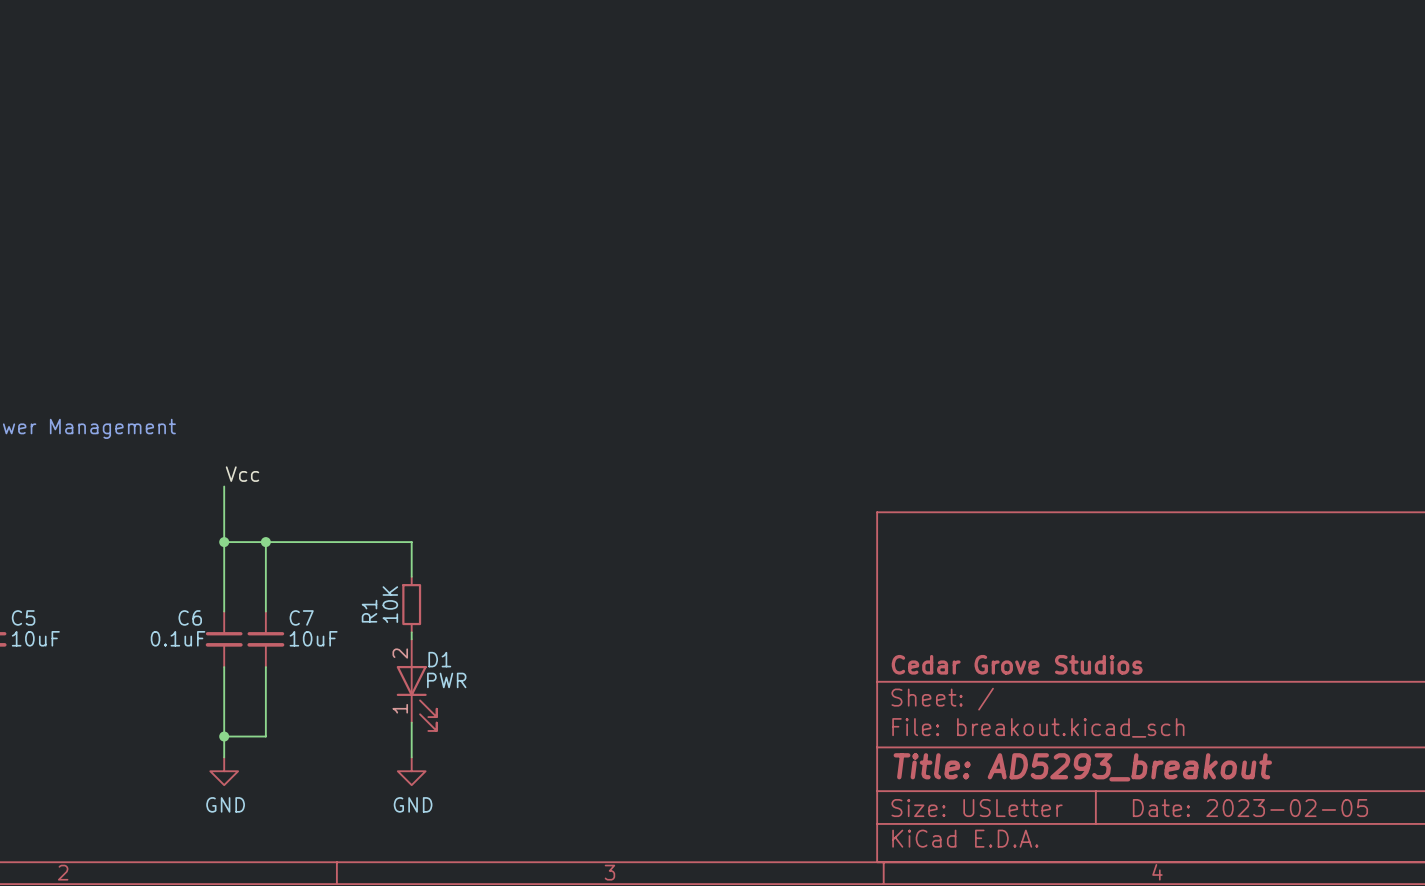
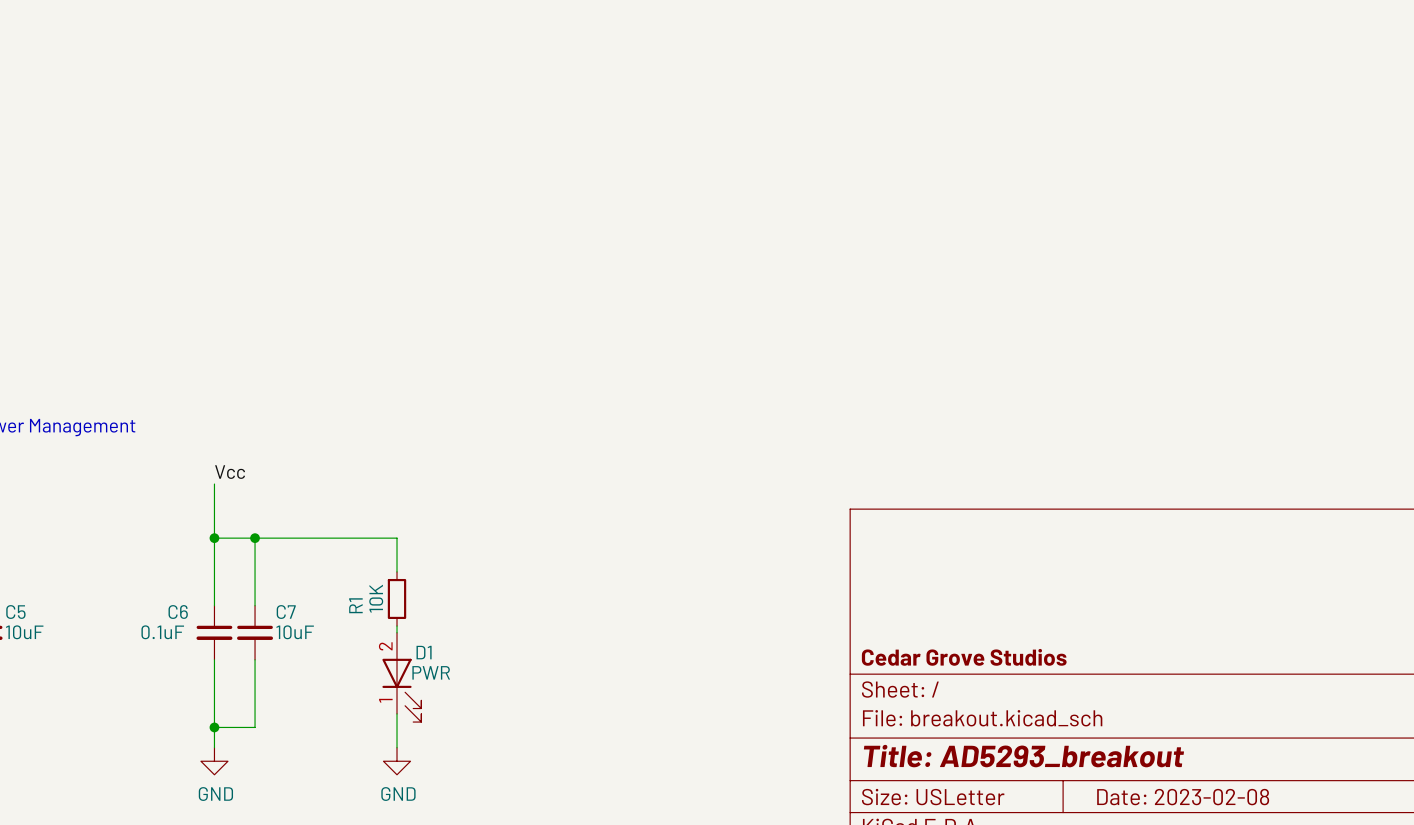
title block: Date: 2023-02-05 (1250, 808) -> Date: 2023-02-08 (1183, 797)

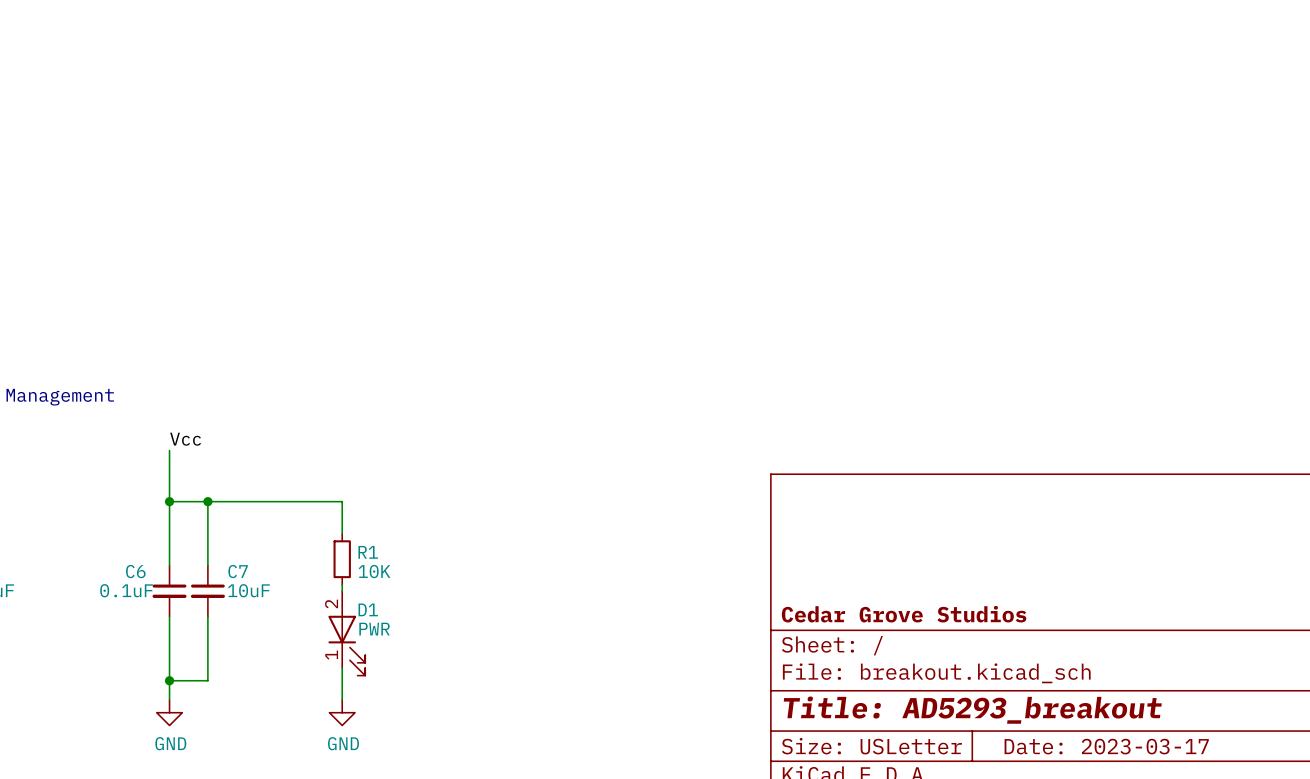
R1 value rotation: 0° (376, 598) -> 90° clockwise (374, 571)
R1 value position: 10K (376, 598) -> 10K (374, 571)
R1 name rotation: 0° (355, 605) -> 90° clockwise (368, 552)
R1 name position: R1 (355, 605) -> R1 (368, 552)
title block: Date: 2023-02-08 (1183, 797) -> Date: 2023-03-17 (1106, 746)

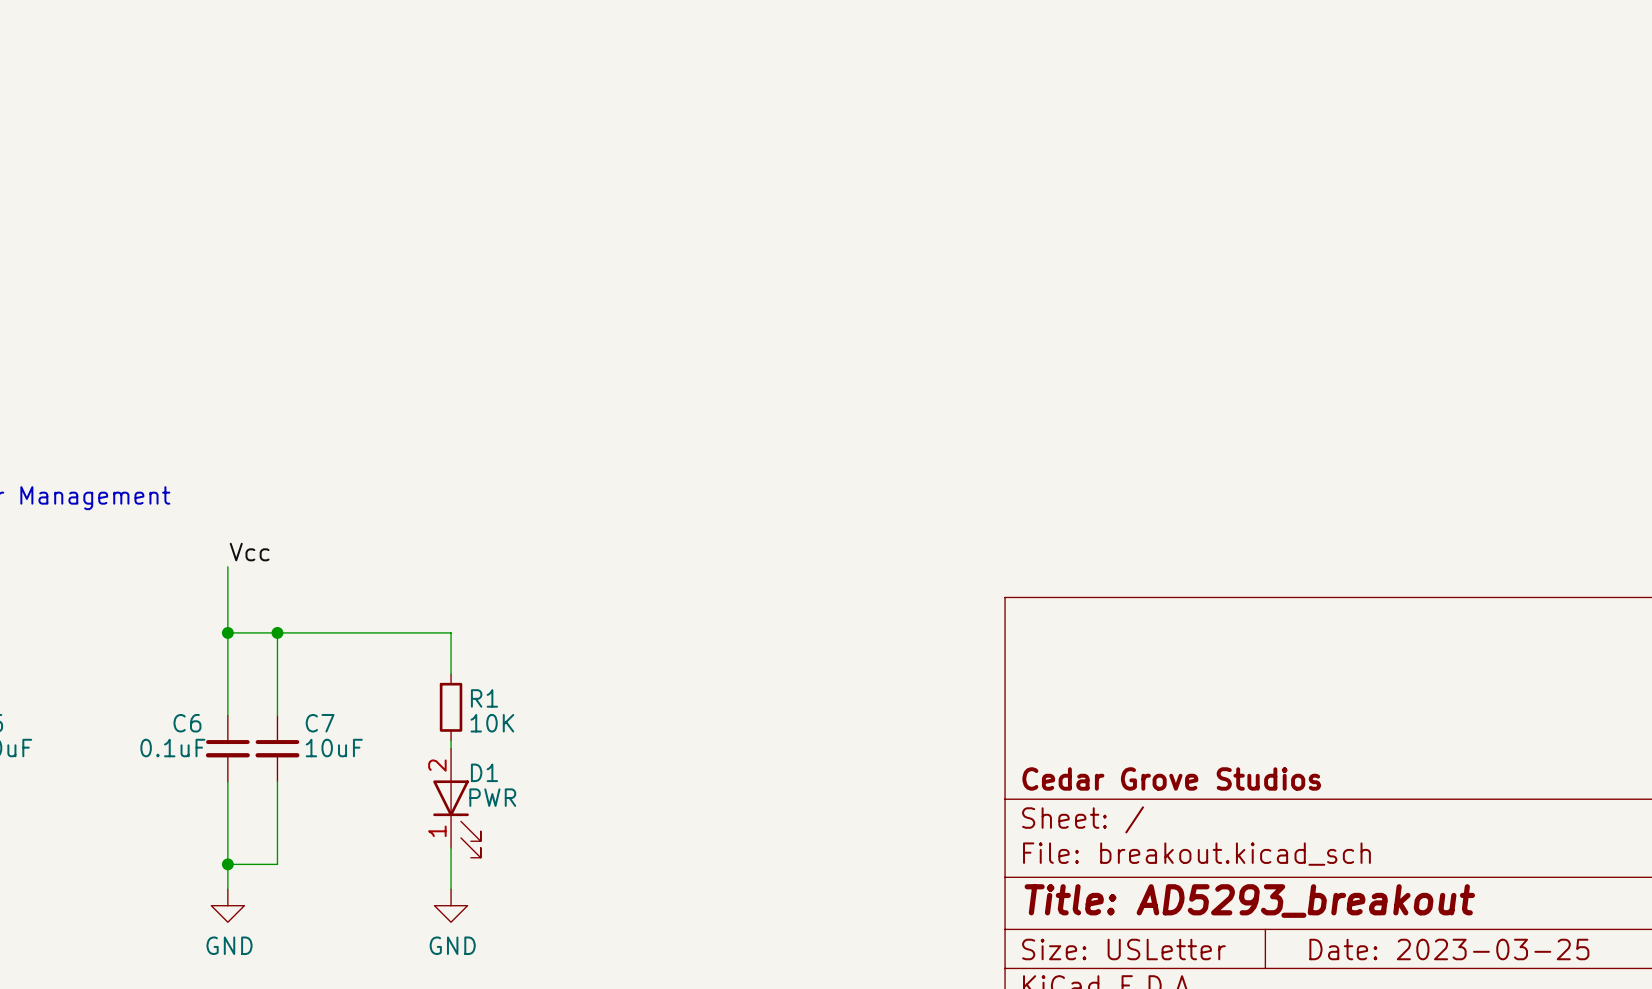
title block: Date: 2023-03-17 (1106, 746) -> Date: 2023-03-25 (1449, 949)

